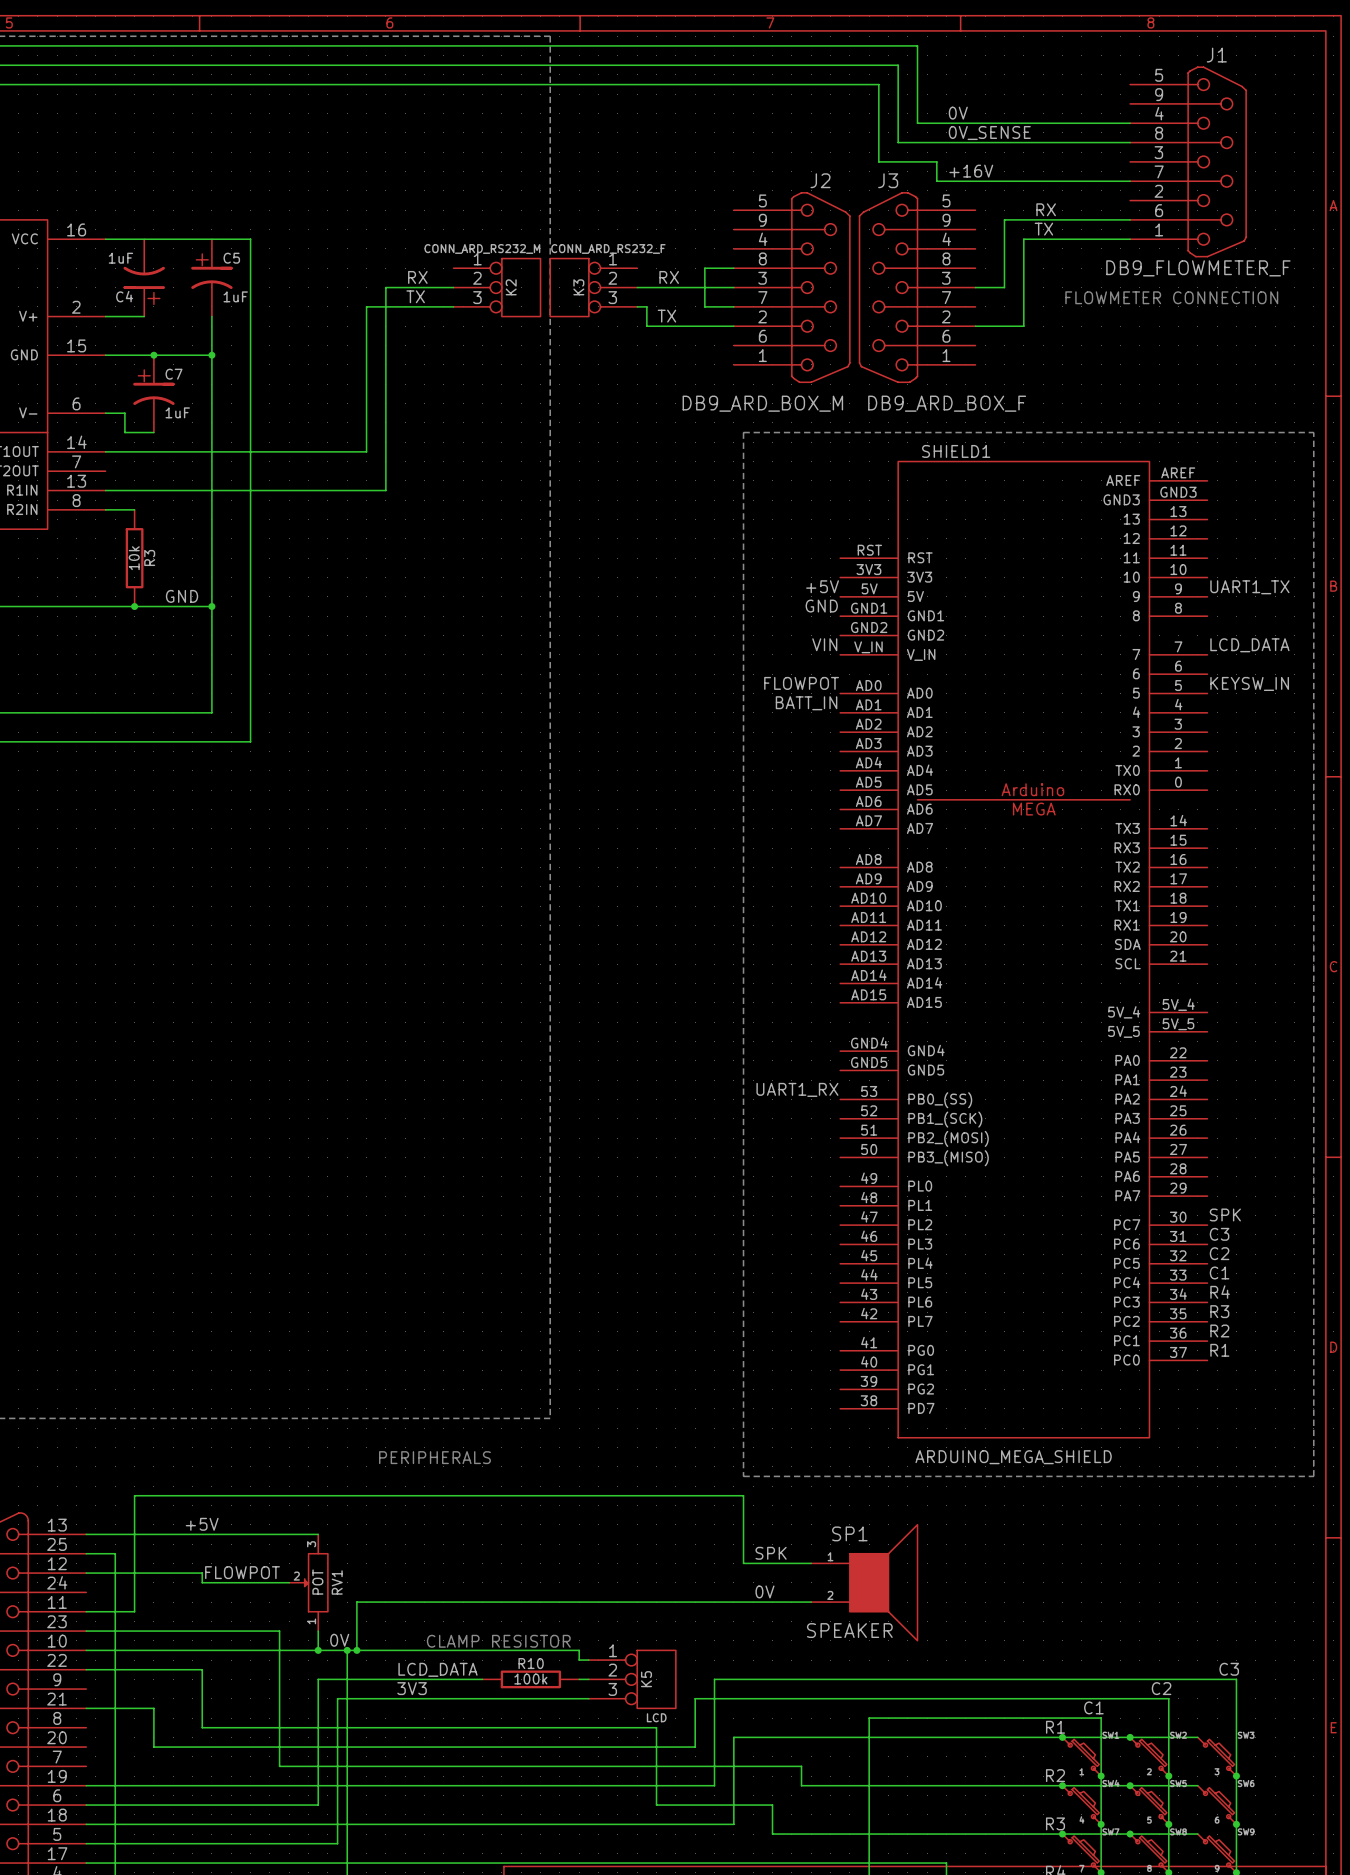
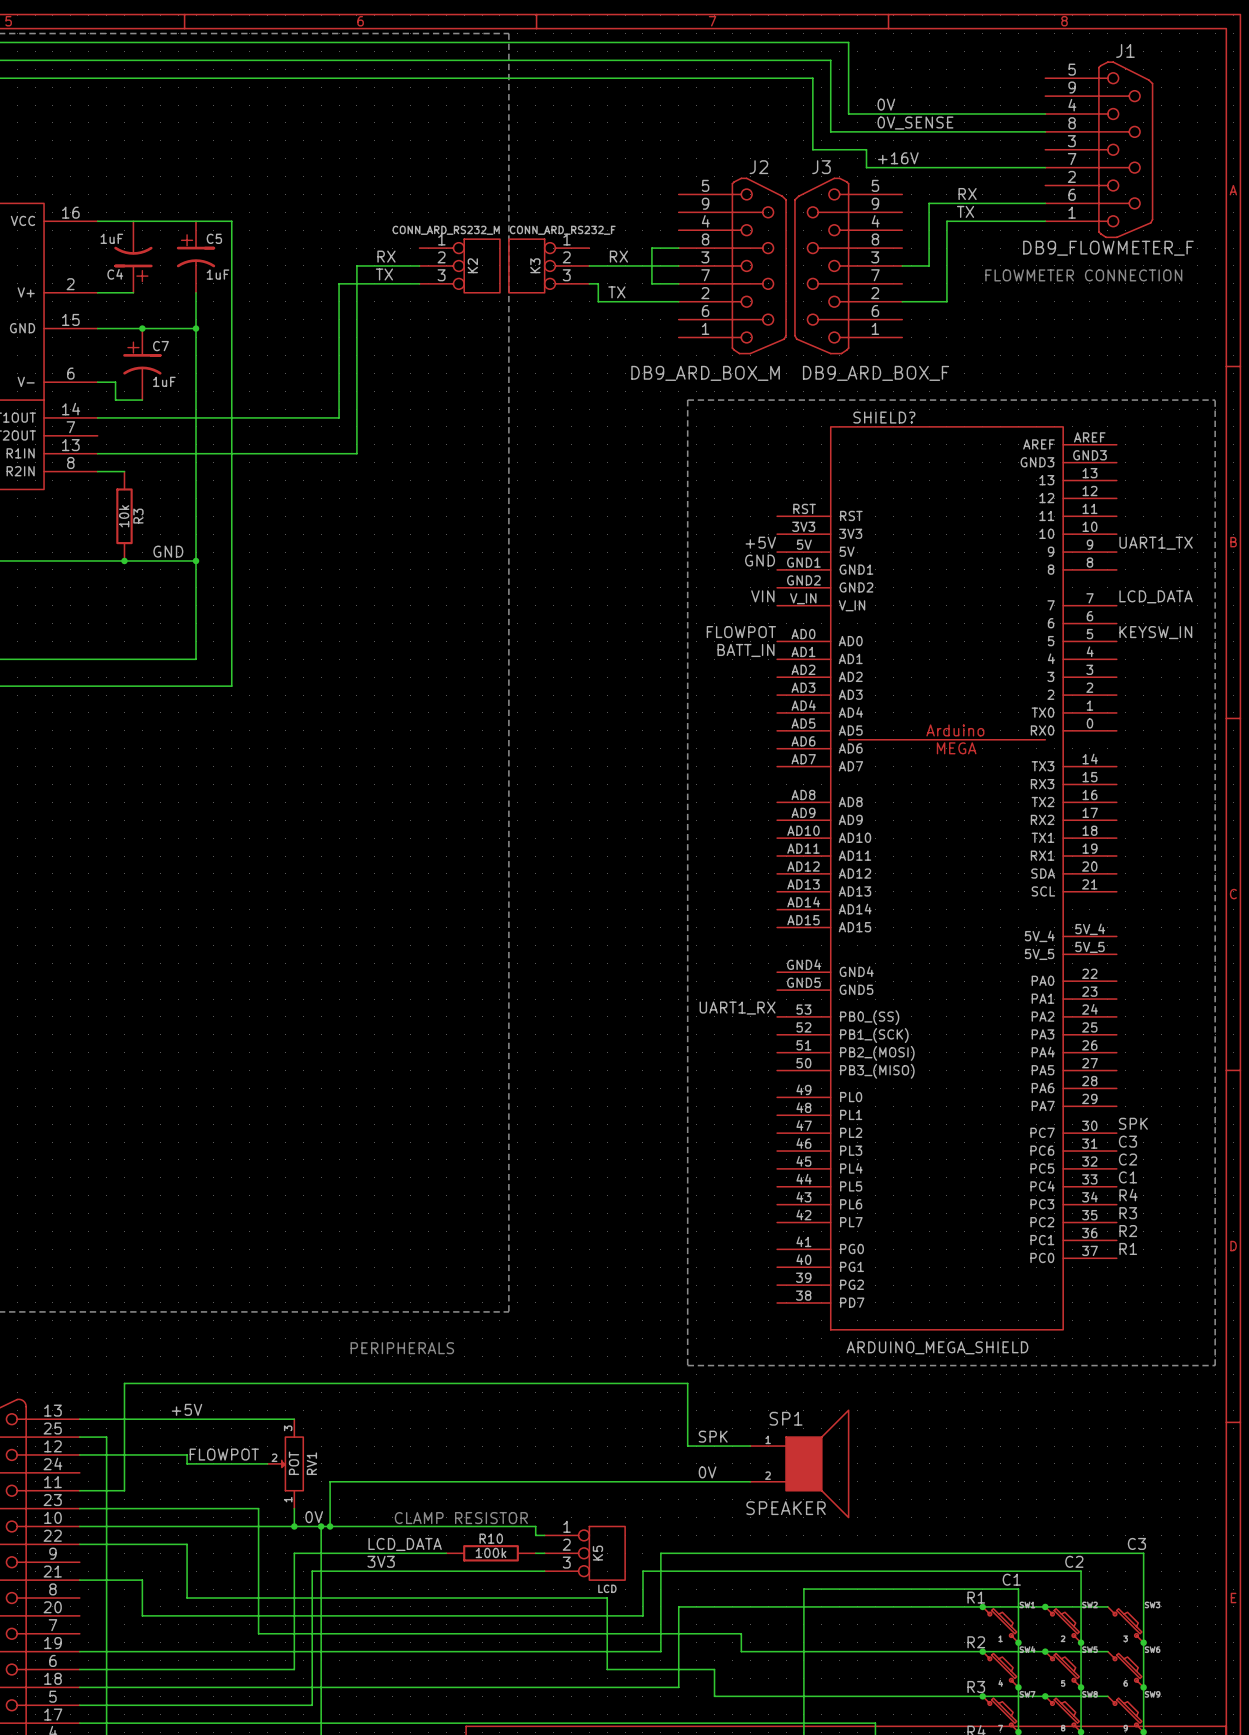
SHIELD1 name: SHIELD1 (956, 451) -> SHIELD? (884, 417)

